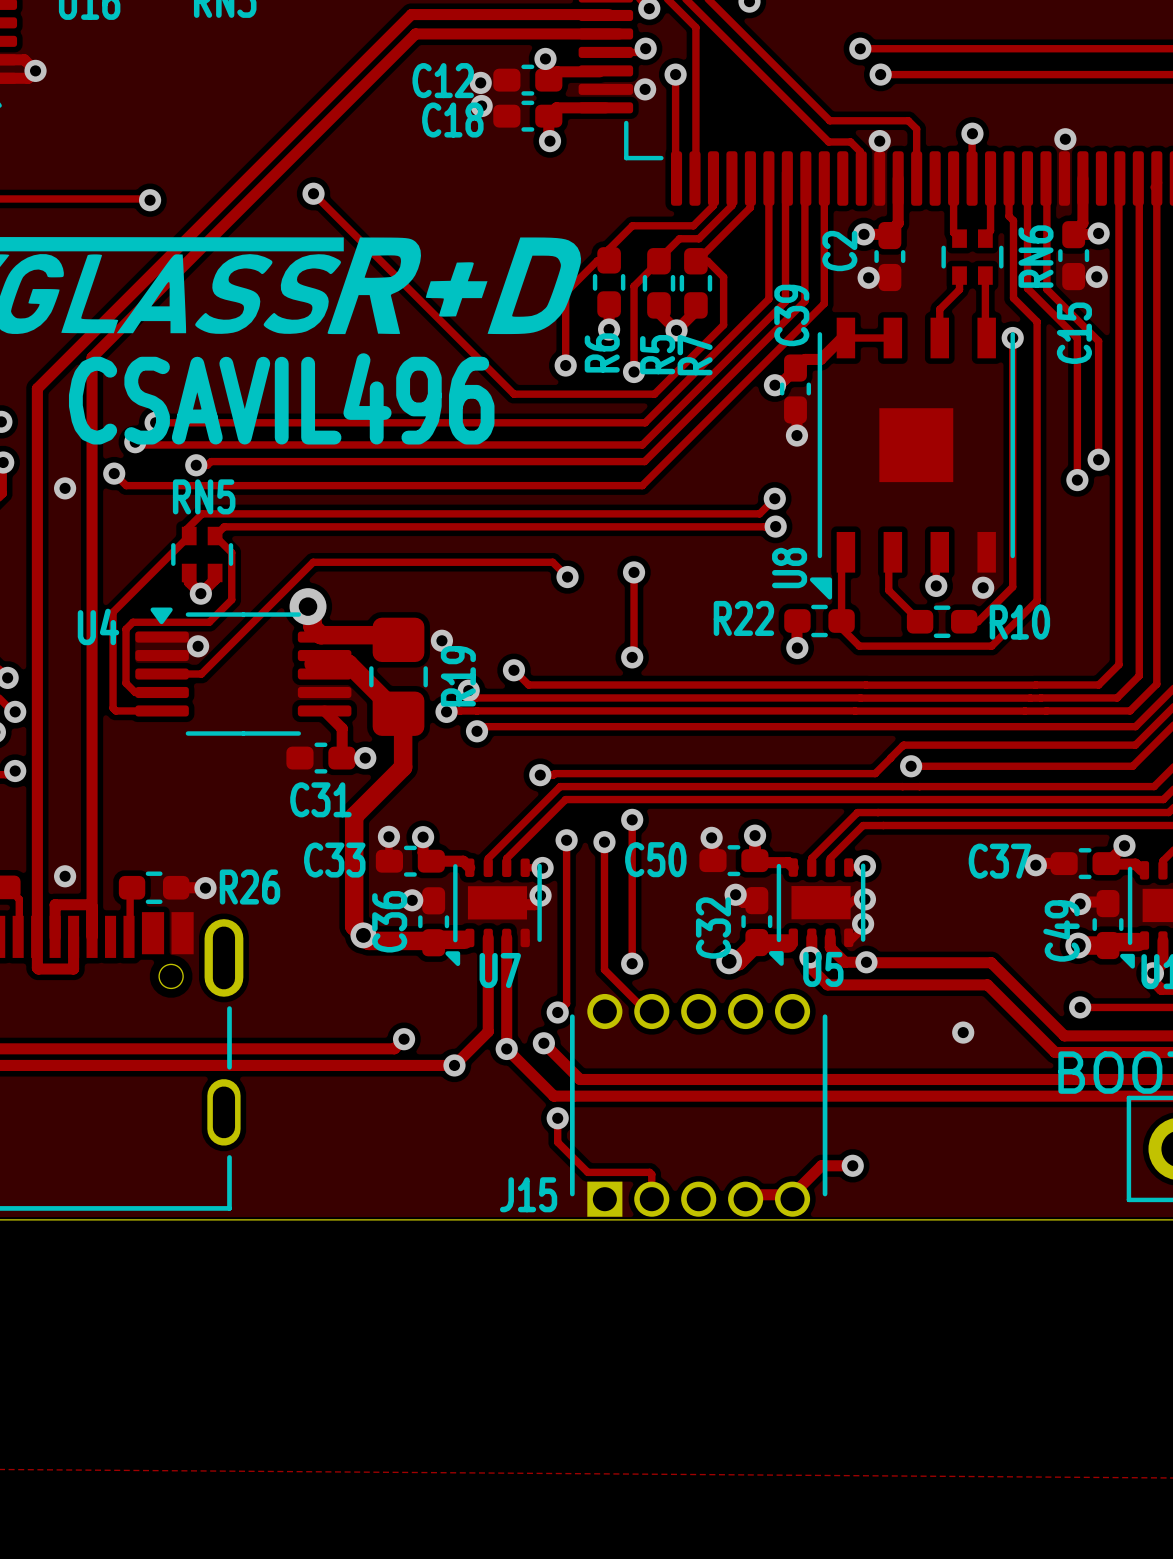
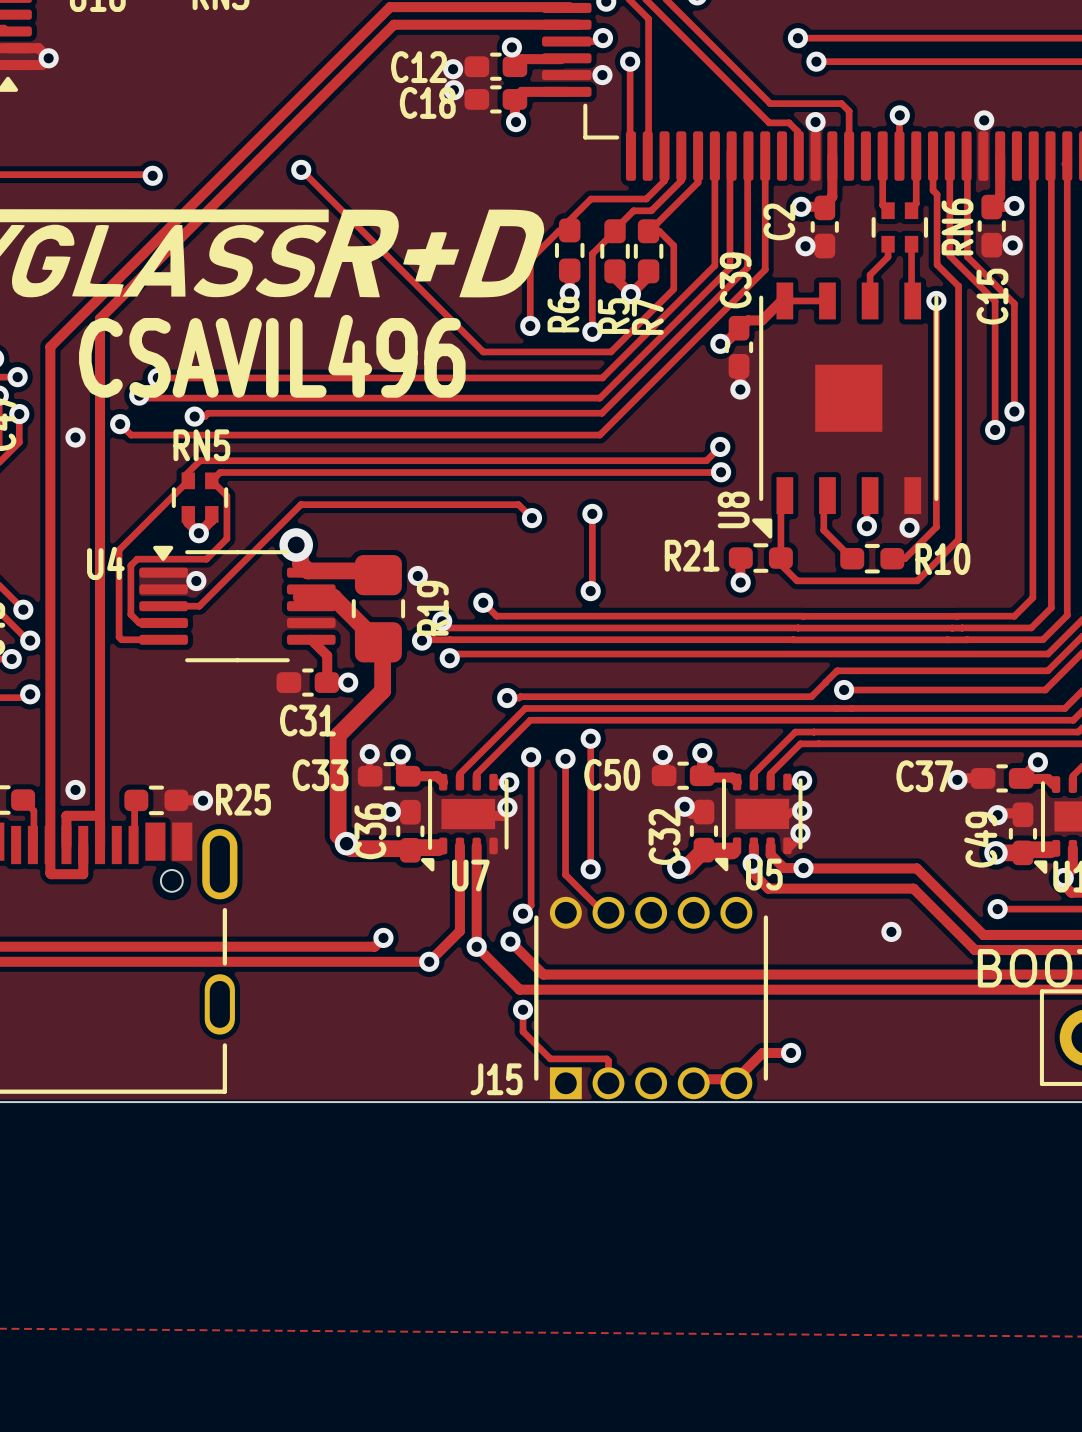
R22 name: R22 (743, 618) -> R21 (692, 555)
R26 name: R26 (249, 887) -> R25 (243, 799)

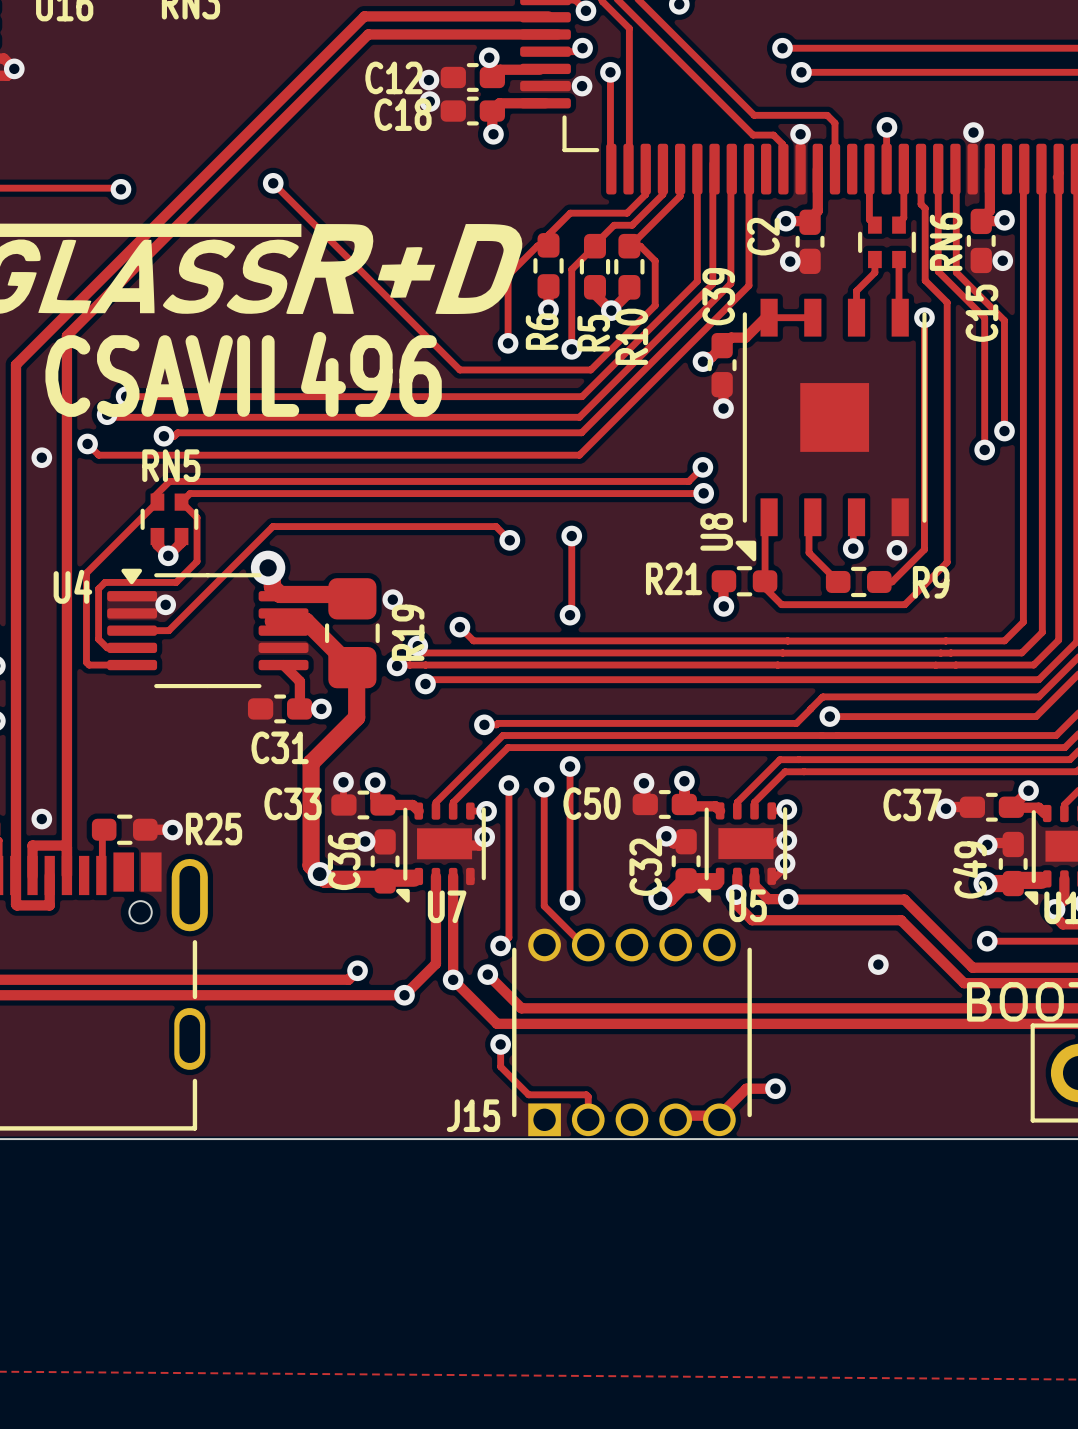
R7 name: R7 (647, 316) -> R10 (631, 336)
R10 name: R10 (942, 559) -> R9 (931, 582)

